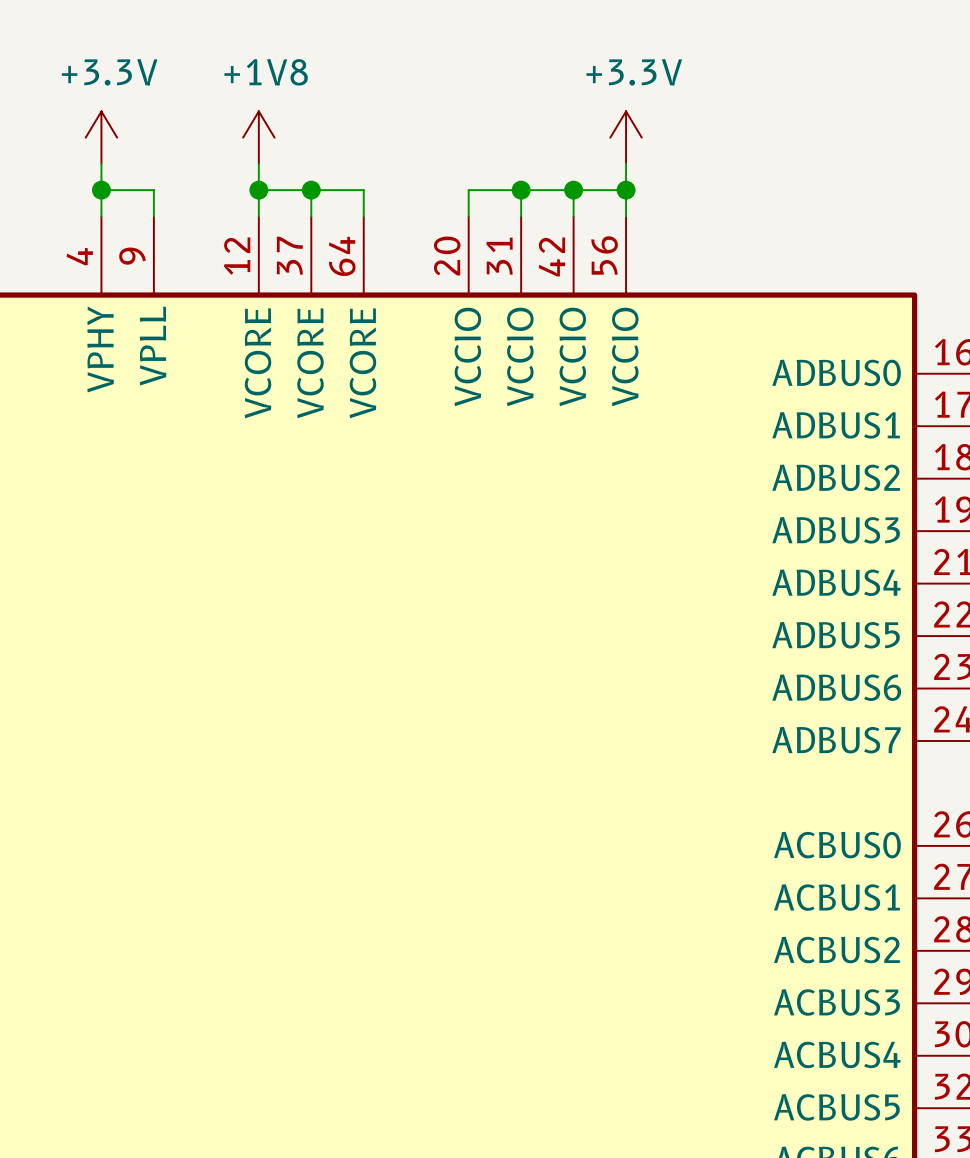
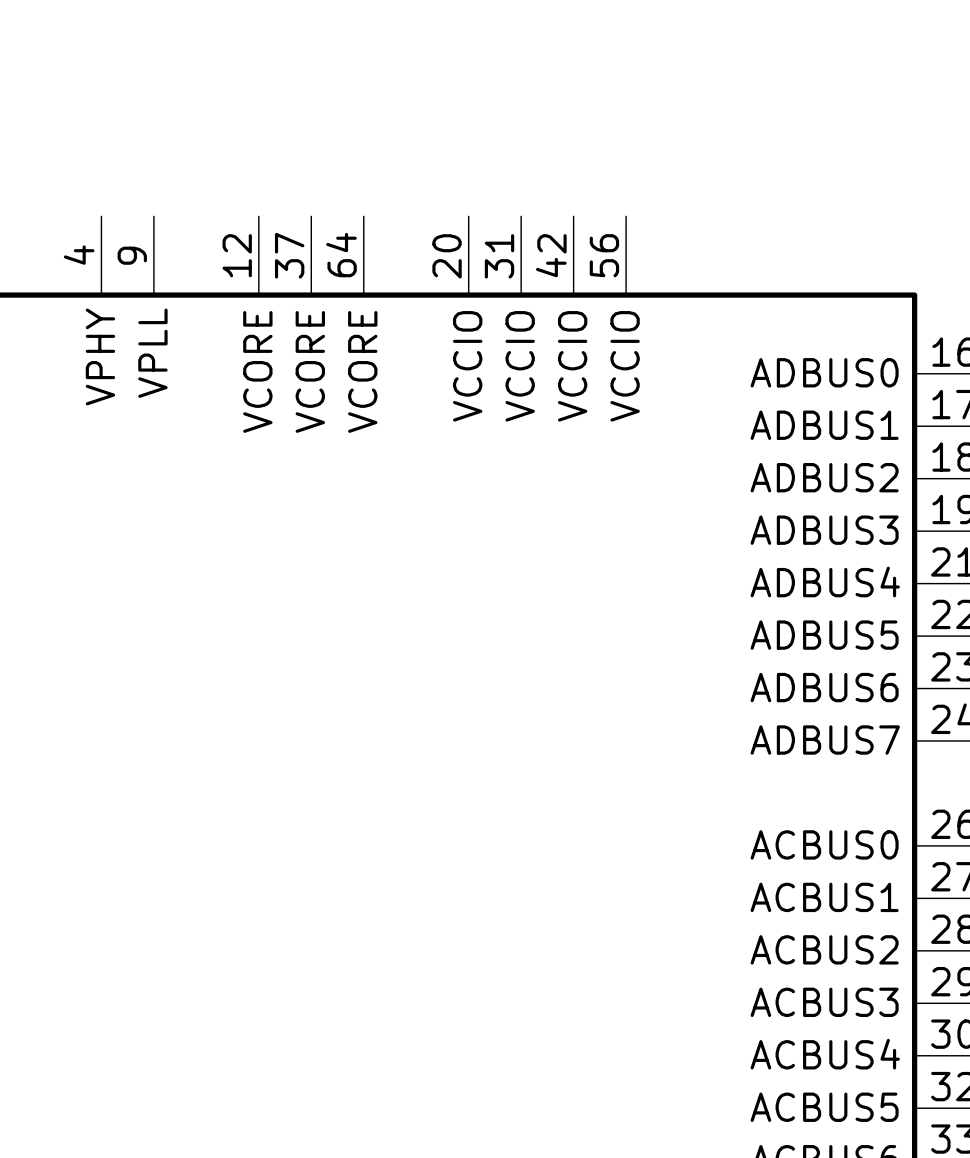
power symbol: +3.3V (101, 137) -> none
power symbol: +1V8 (258, 137) -> none
power symbol: +3.3V (626, 137) -> none
wire: (101, 163) (101, 216) -> none
wire: (258, 163) (258, 216) -> none
wire: (626, 163) (626, 216) -> none
wire: (101, 190) (153, 190) (153, 216) -> none
junction: (101, 190) -> none
wire: (258, 190) (363, 190) (363, 216) -> none
junction: (258, 190) -> none
wire: (311, 190) (311, 216) -> none
junction: (311, 190) -> none
wire: (521, 190) (521, 216) -> none
junction: (521, 190) -> none
wire: (573, 190) (573, 216) -> none
junction: (573, 190) -> none
wire: (626, 190) (468, 190) (468, 216) -> none
junction: (626, 190) -> none

